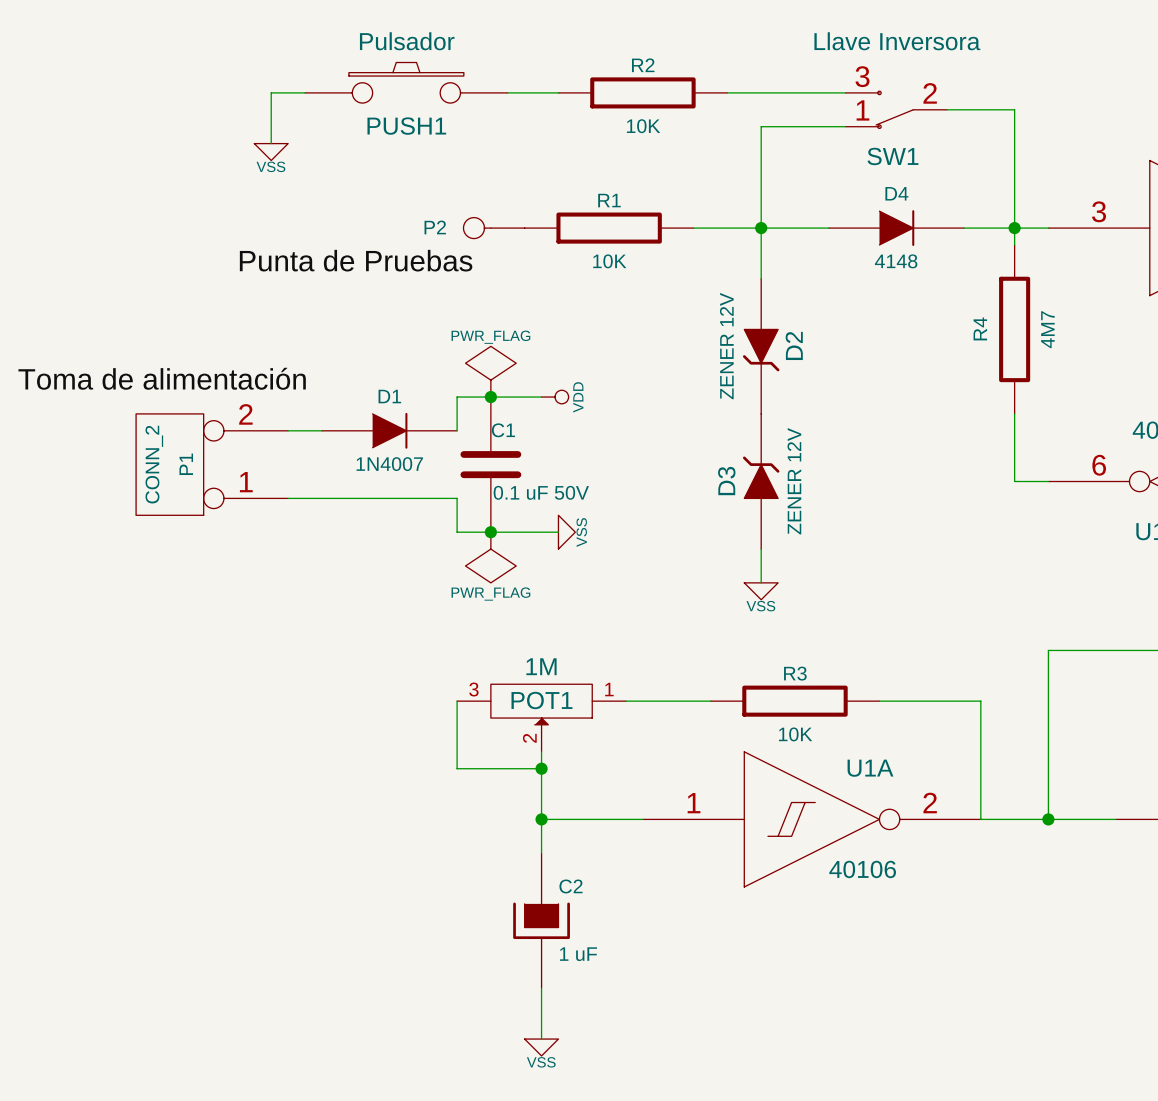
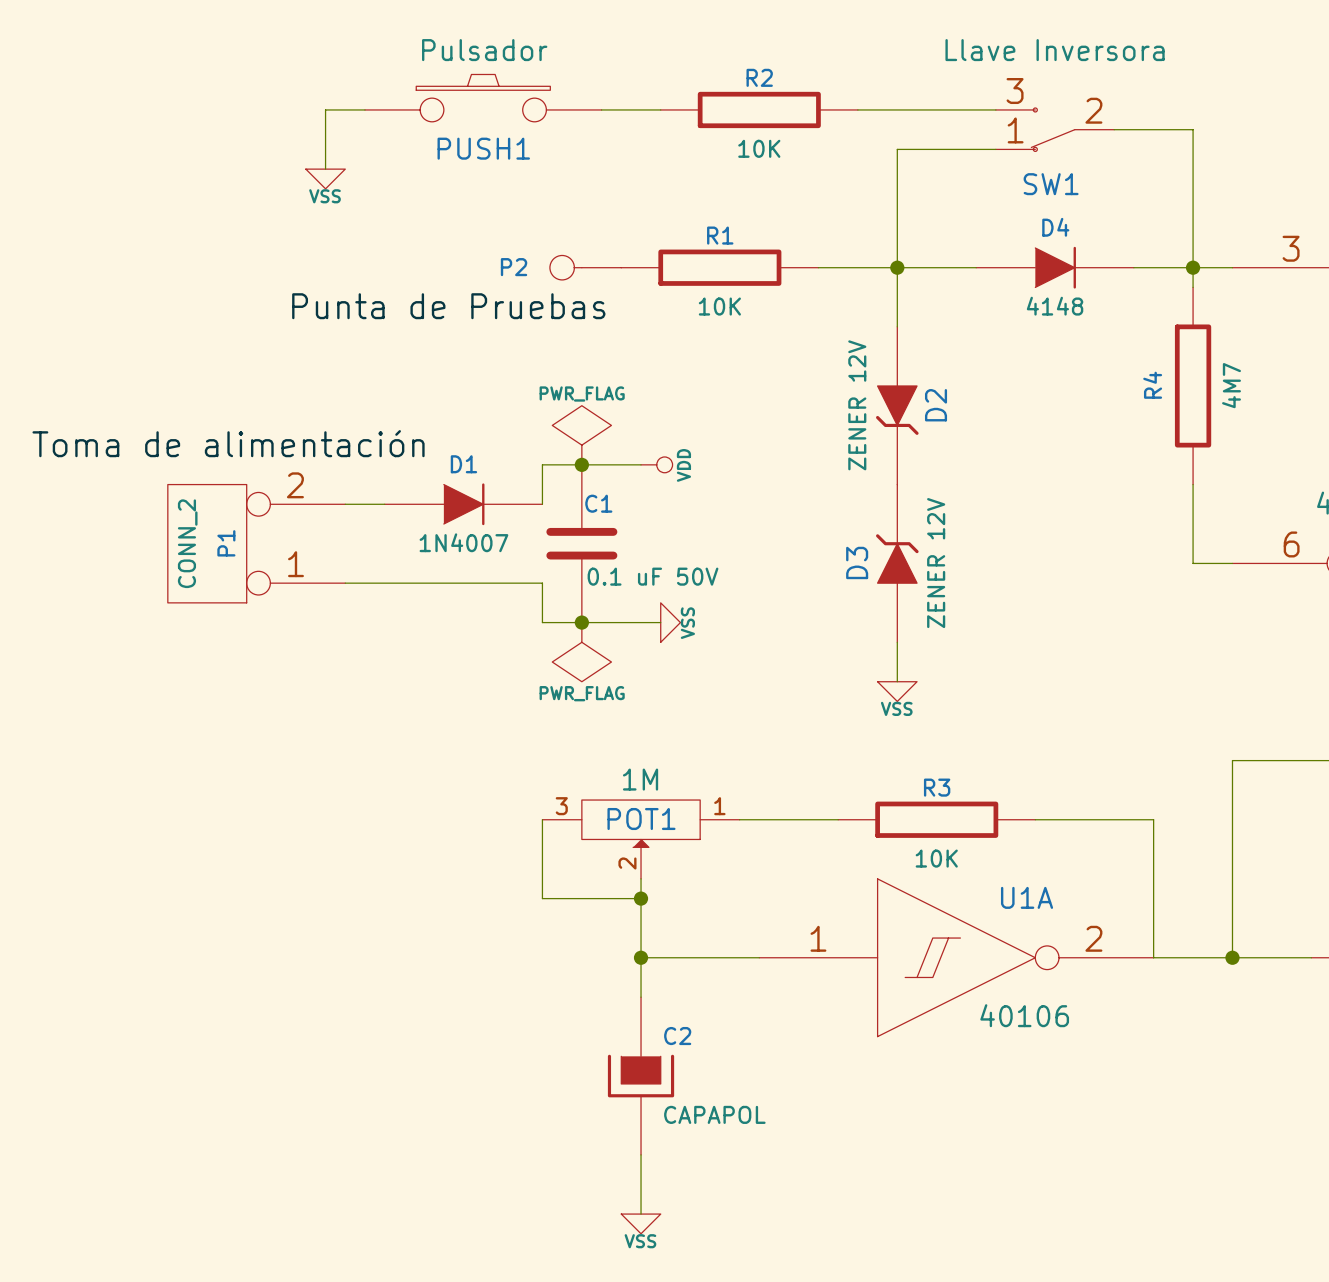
C2 value: 1 uF (578, 954) -> CAPAPOL (714, 1114)

